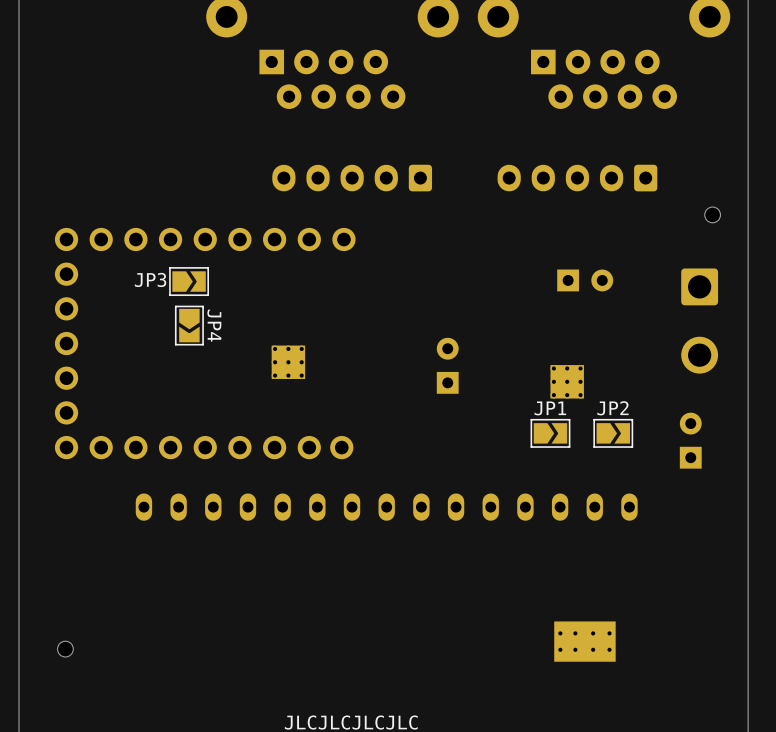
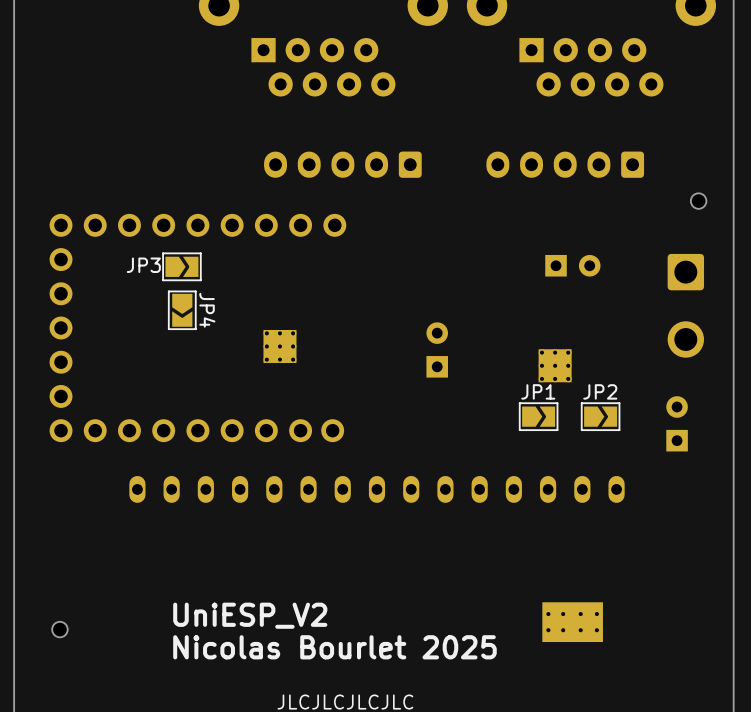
text: none -> UniESP_V2 (250, 615)
text: none -> Nicolas Bourlet 2025 (334, 647)

